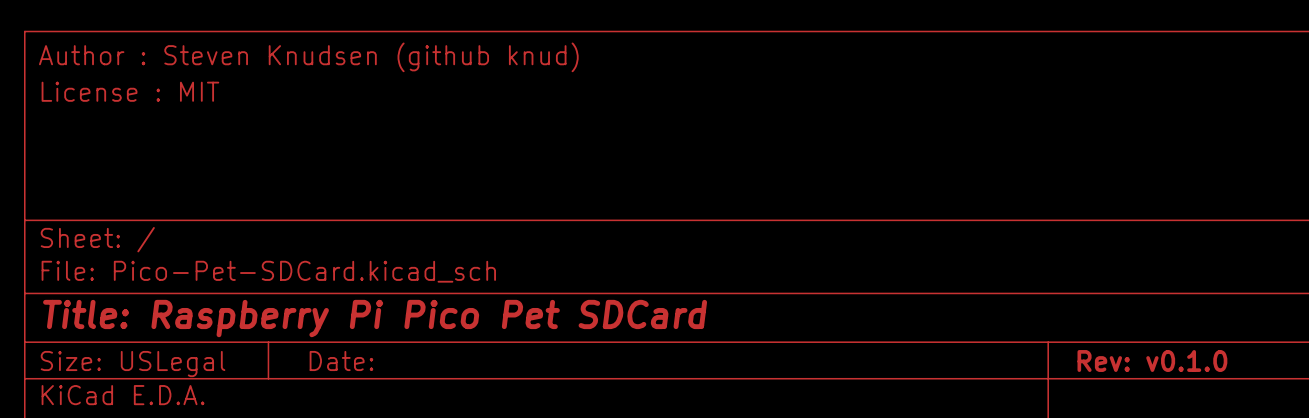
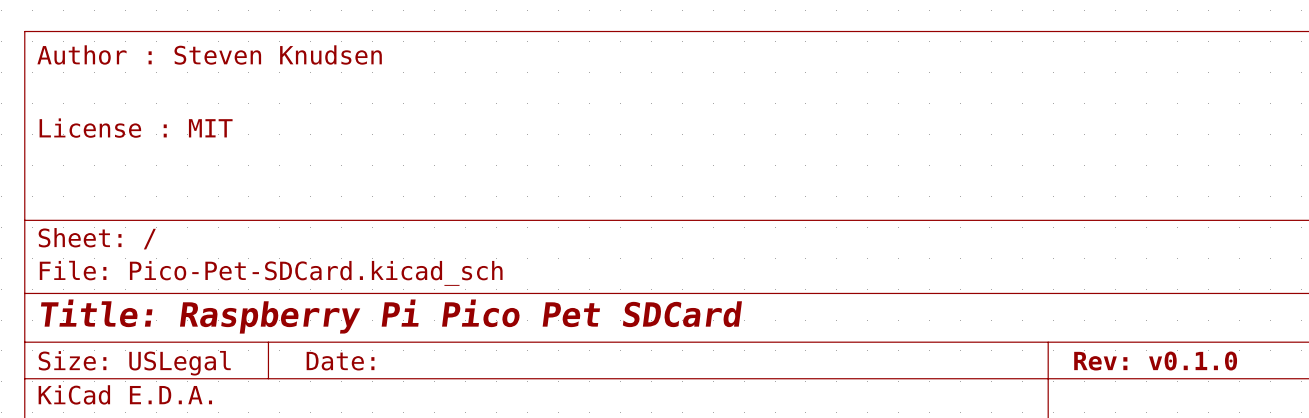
title block: Author : Steven Knudsen (github knud) (308, 57) -> Author : Steven Knudsen (209, 54)
title block position: License : MIT (130, 91) -> License : MIT (136, 128)

